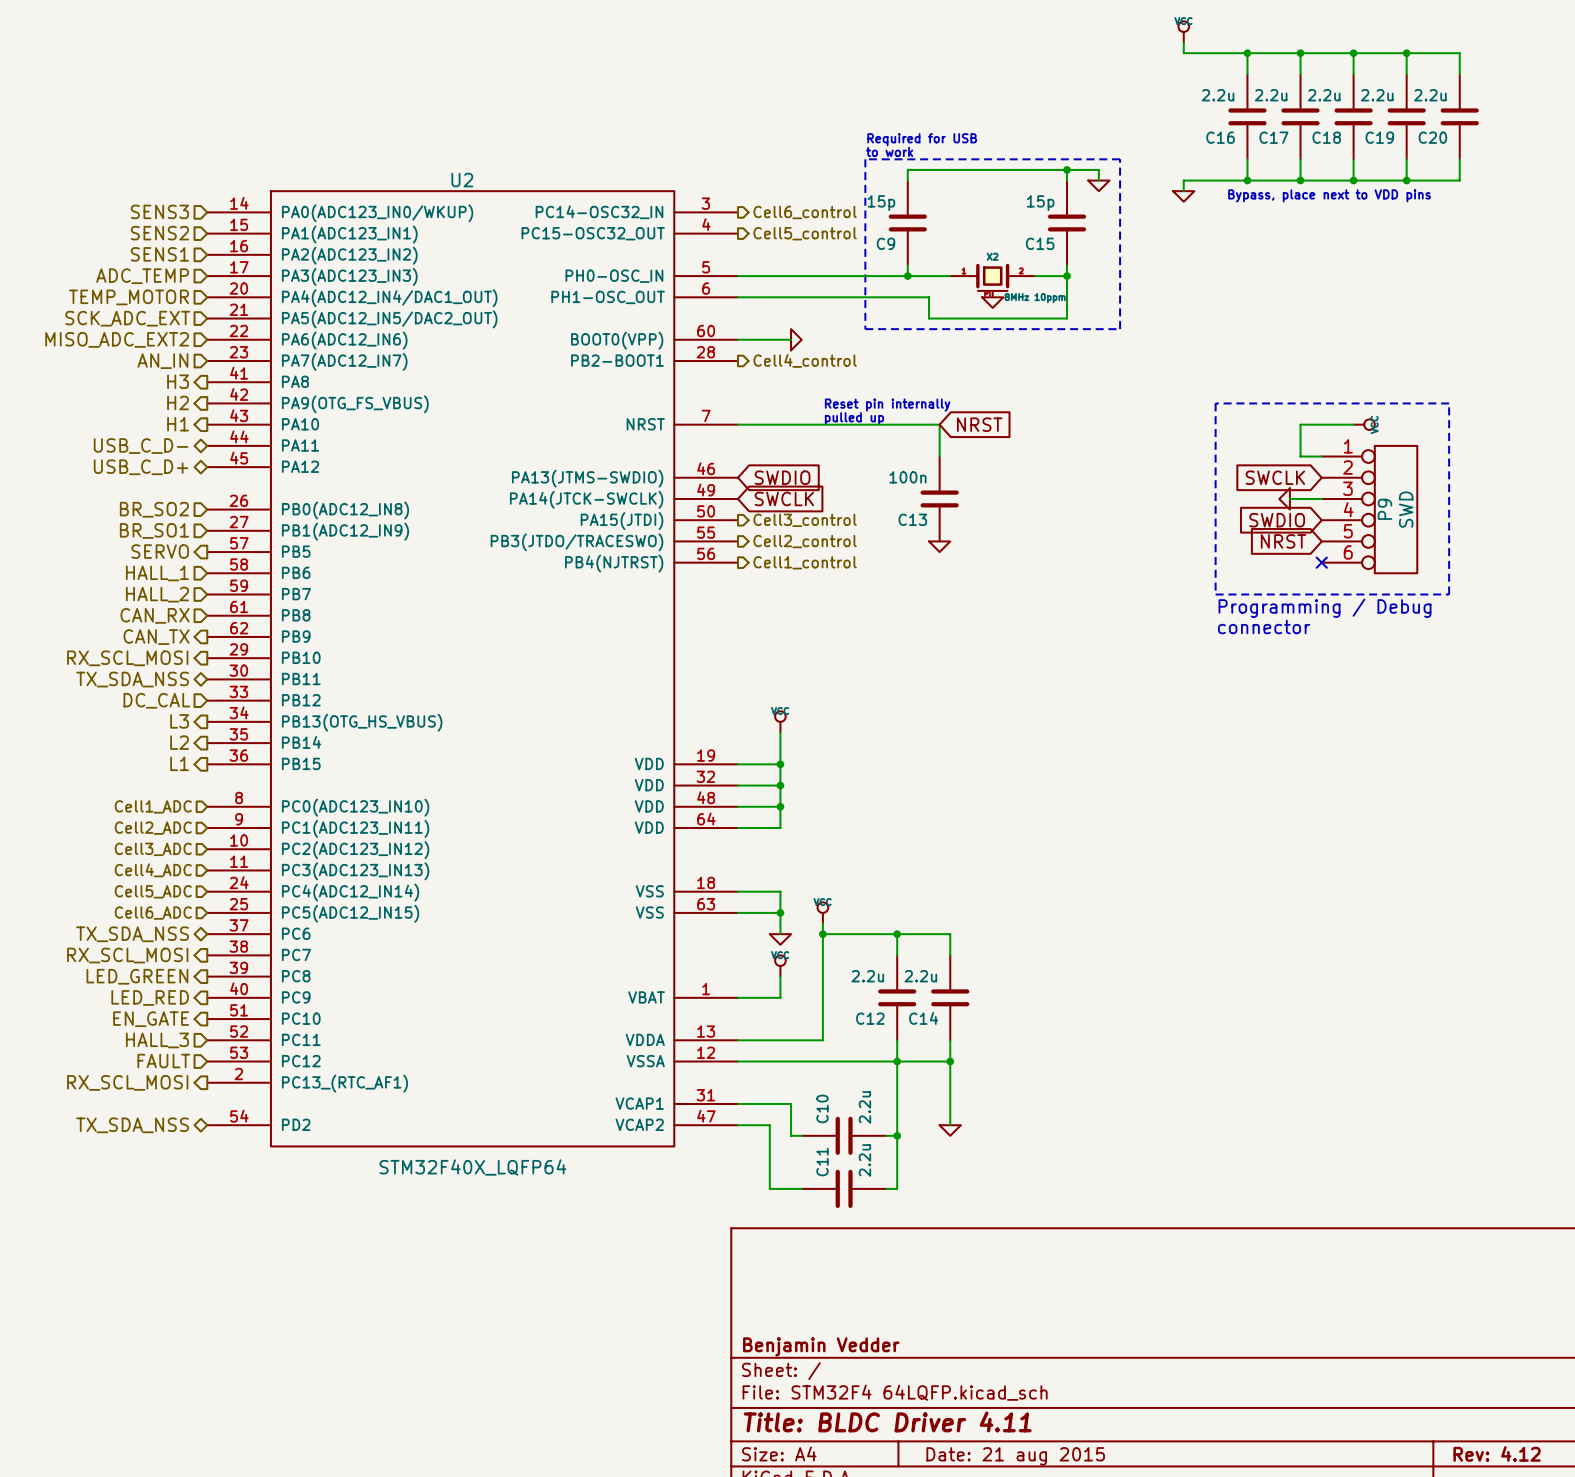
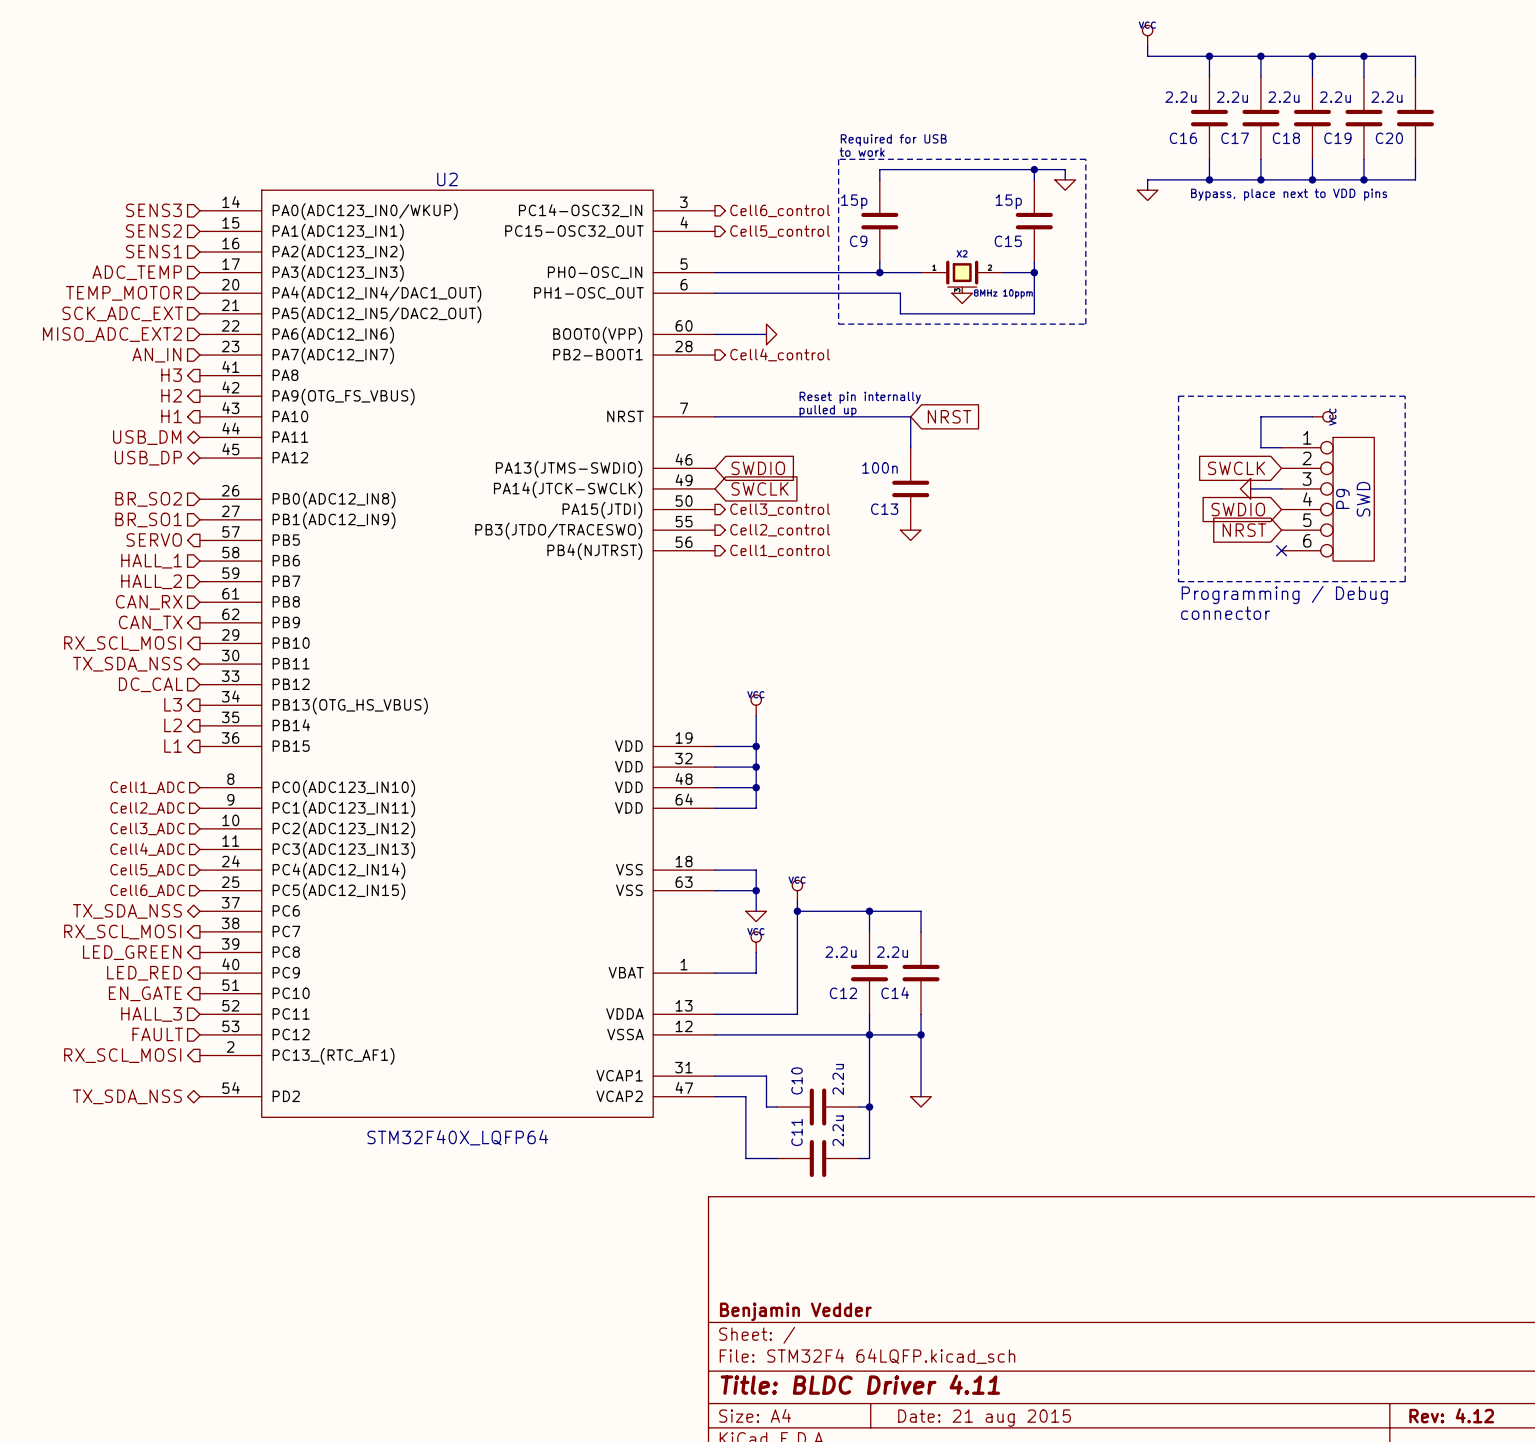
hierarchical label: USB_C_D- (141, 446) -> USB_DM (147, 437)
hierarchical label: USB_C_D+ (141, 467) -> USB_DP (148, 458)

